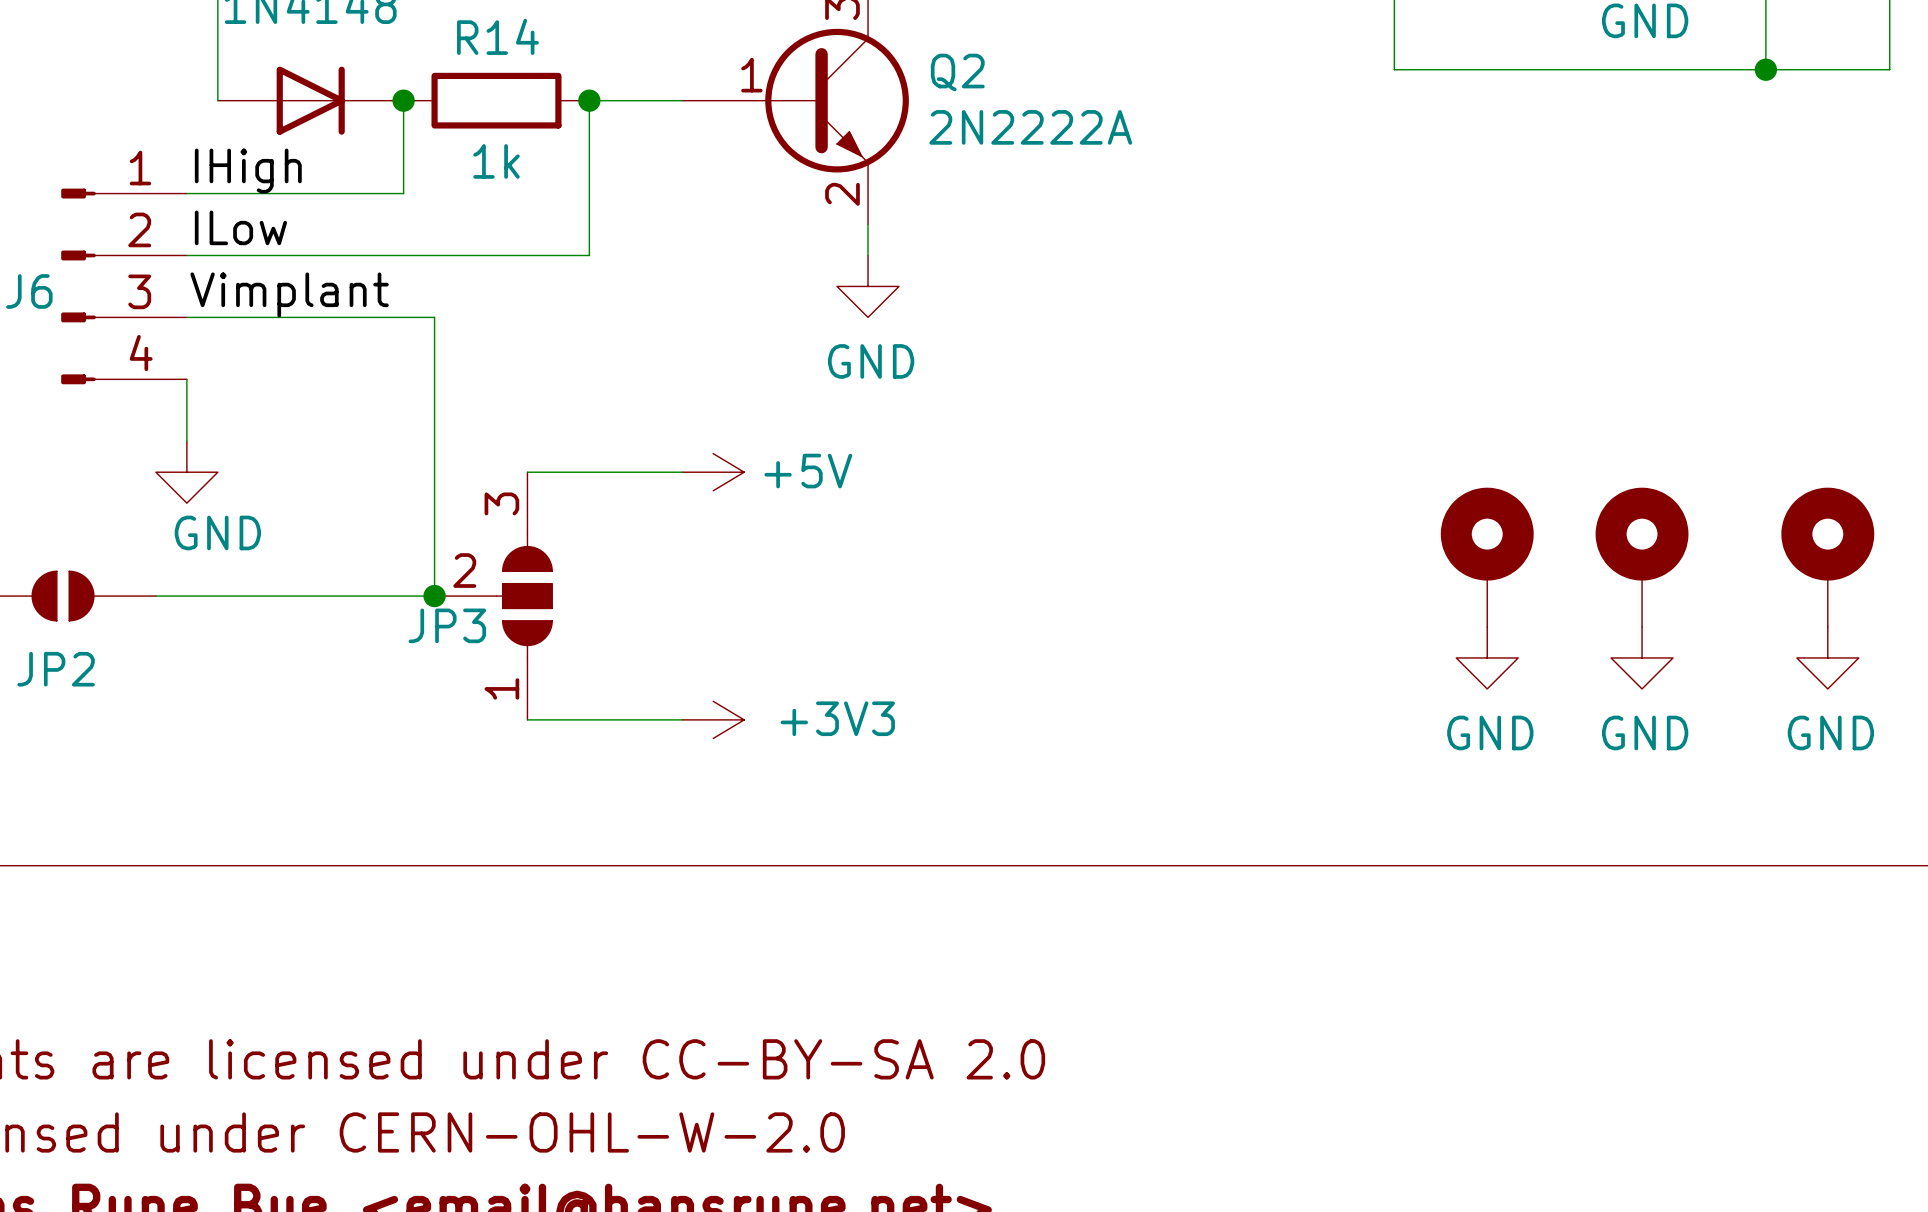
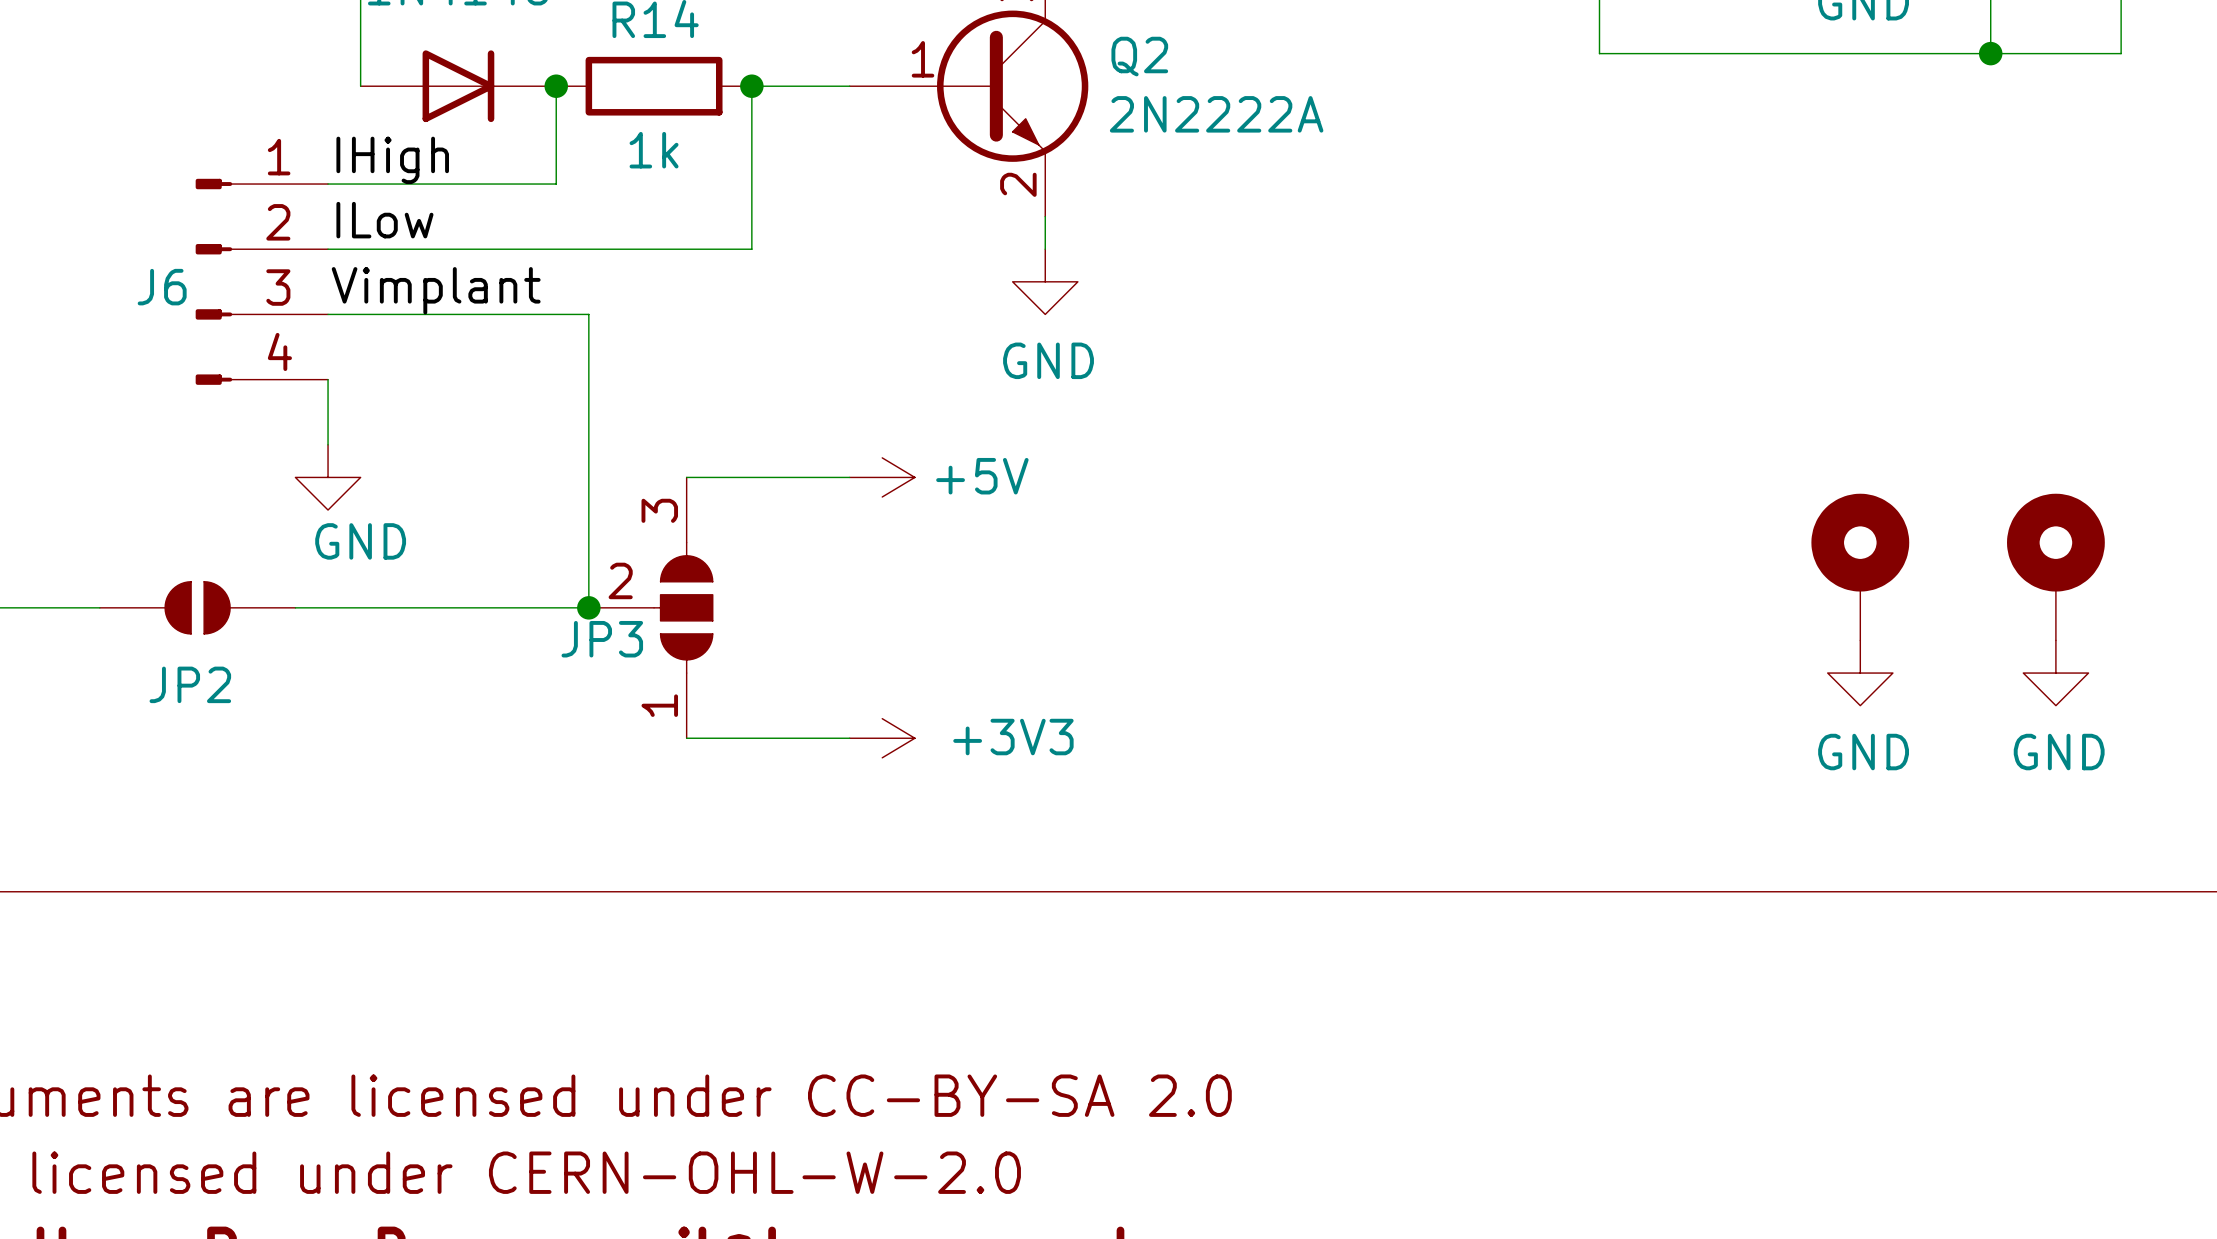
part: (1487, 557) -> none
power symbol: GND (1487, 657) -> none

